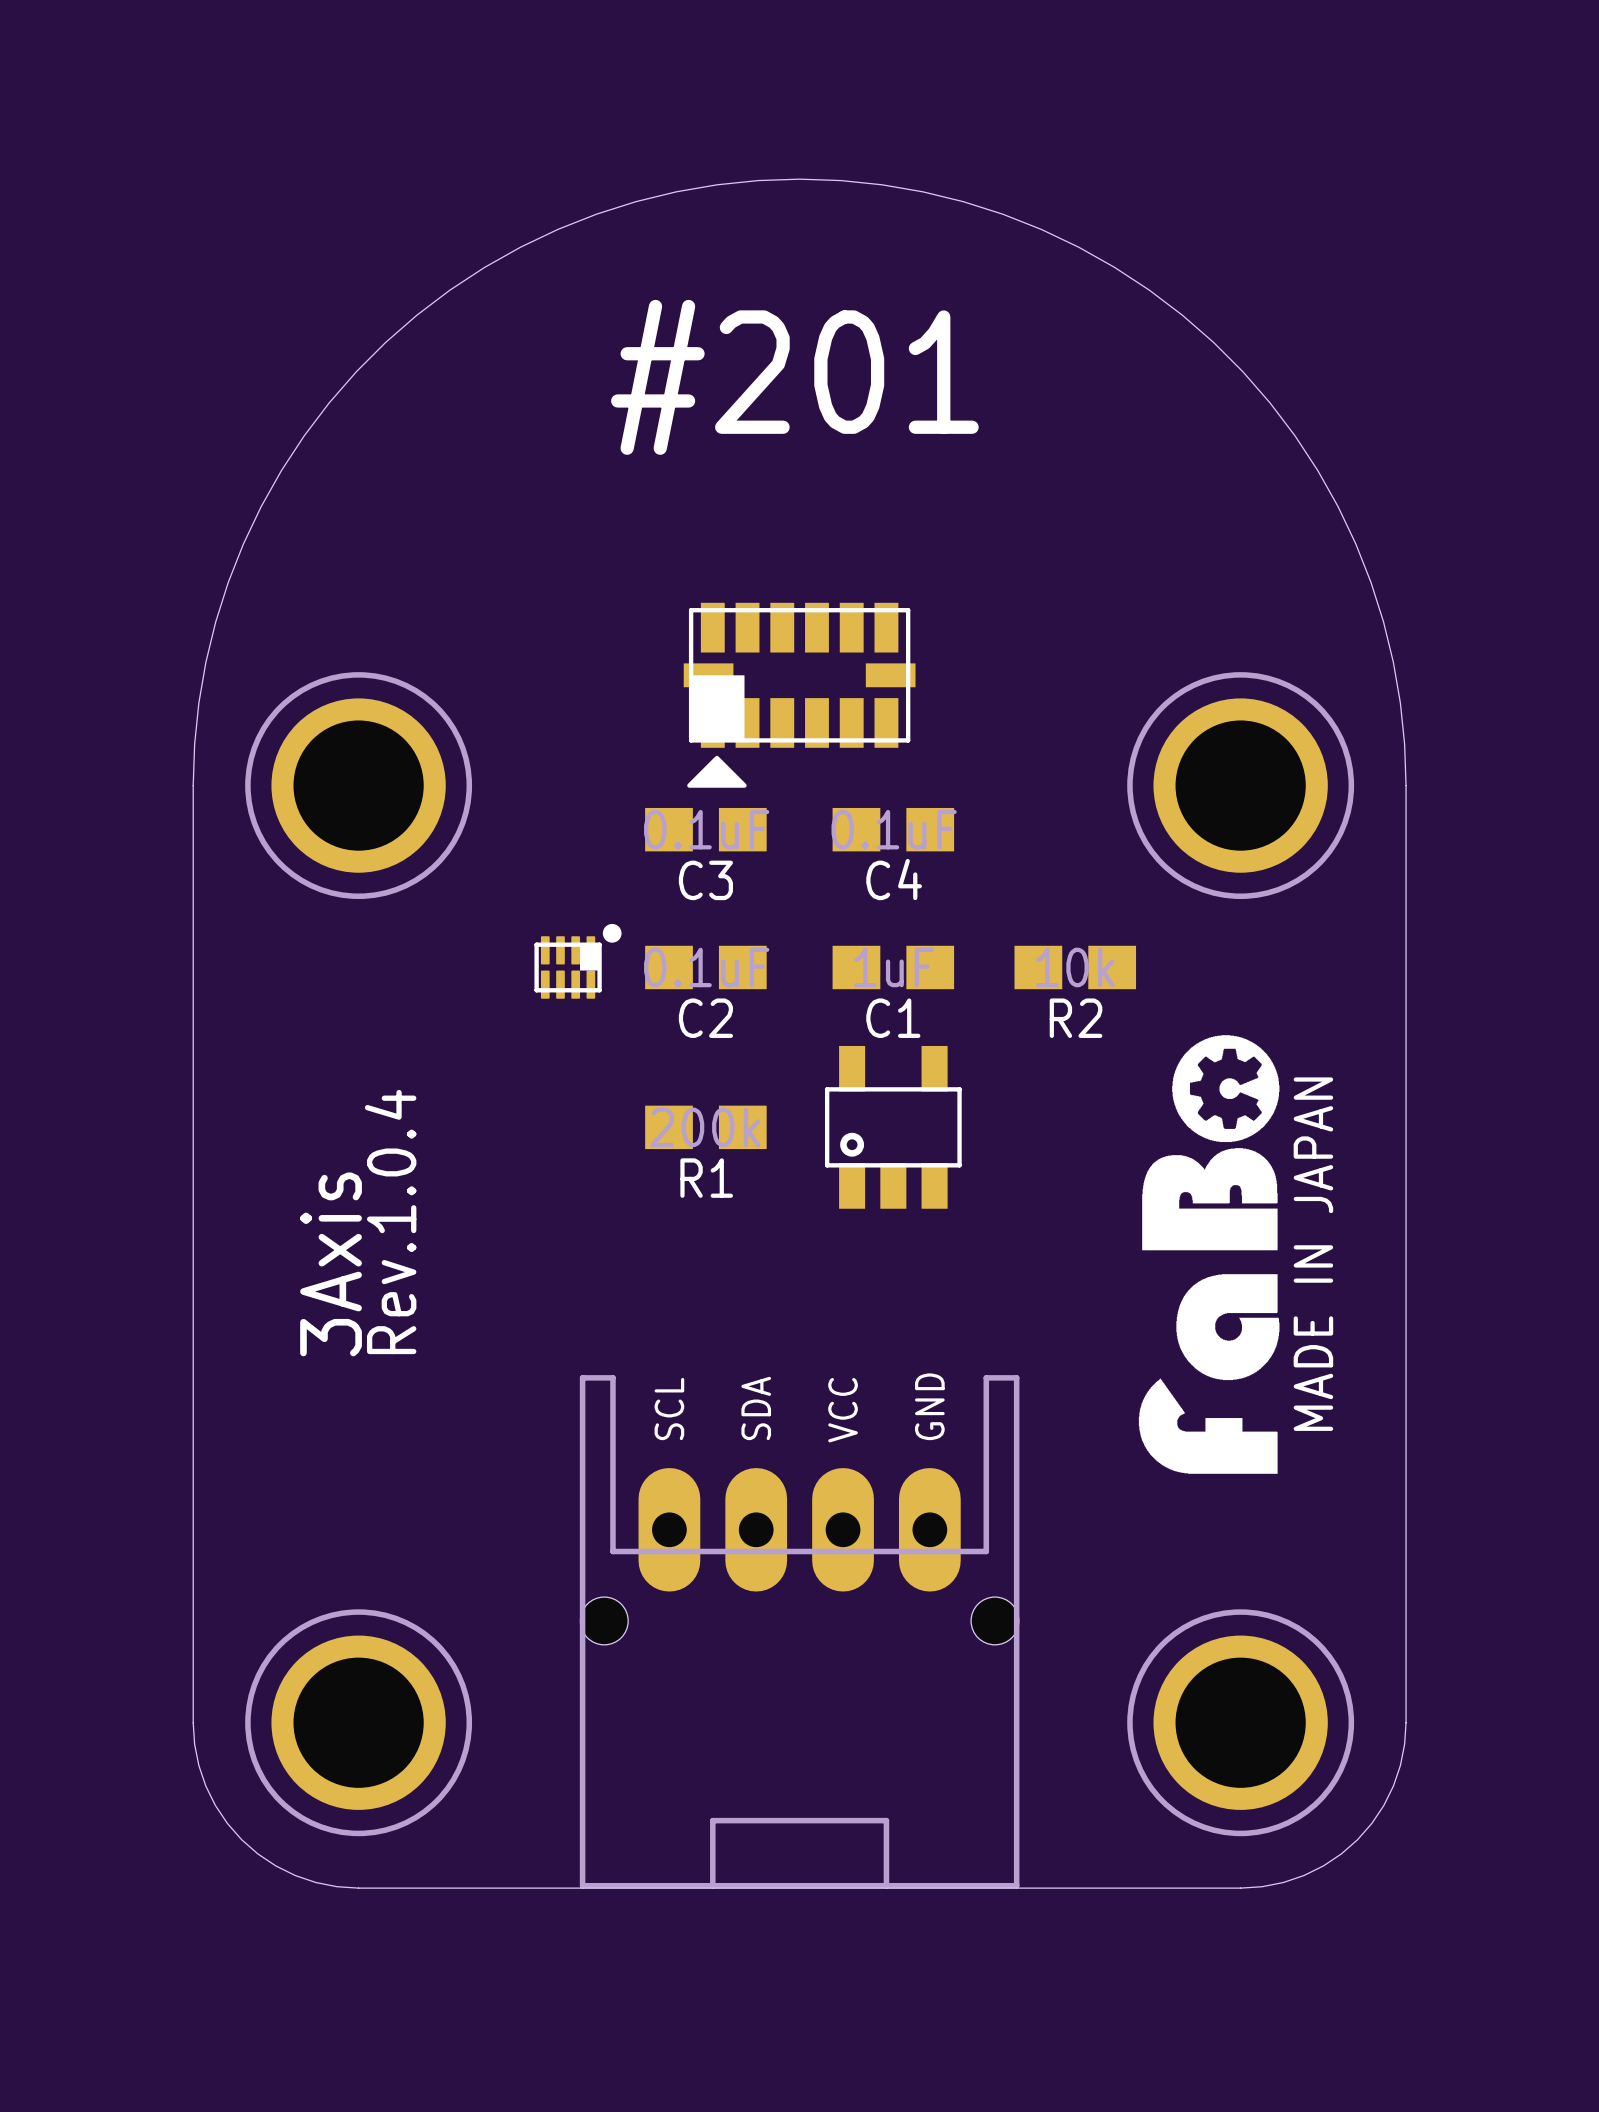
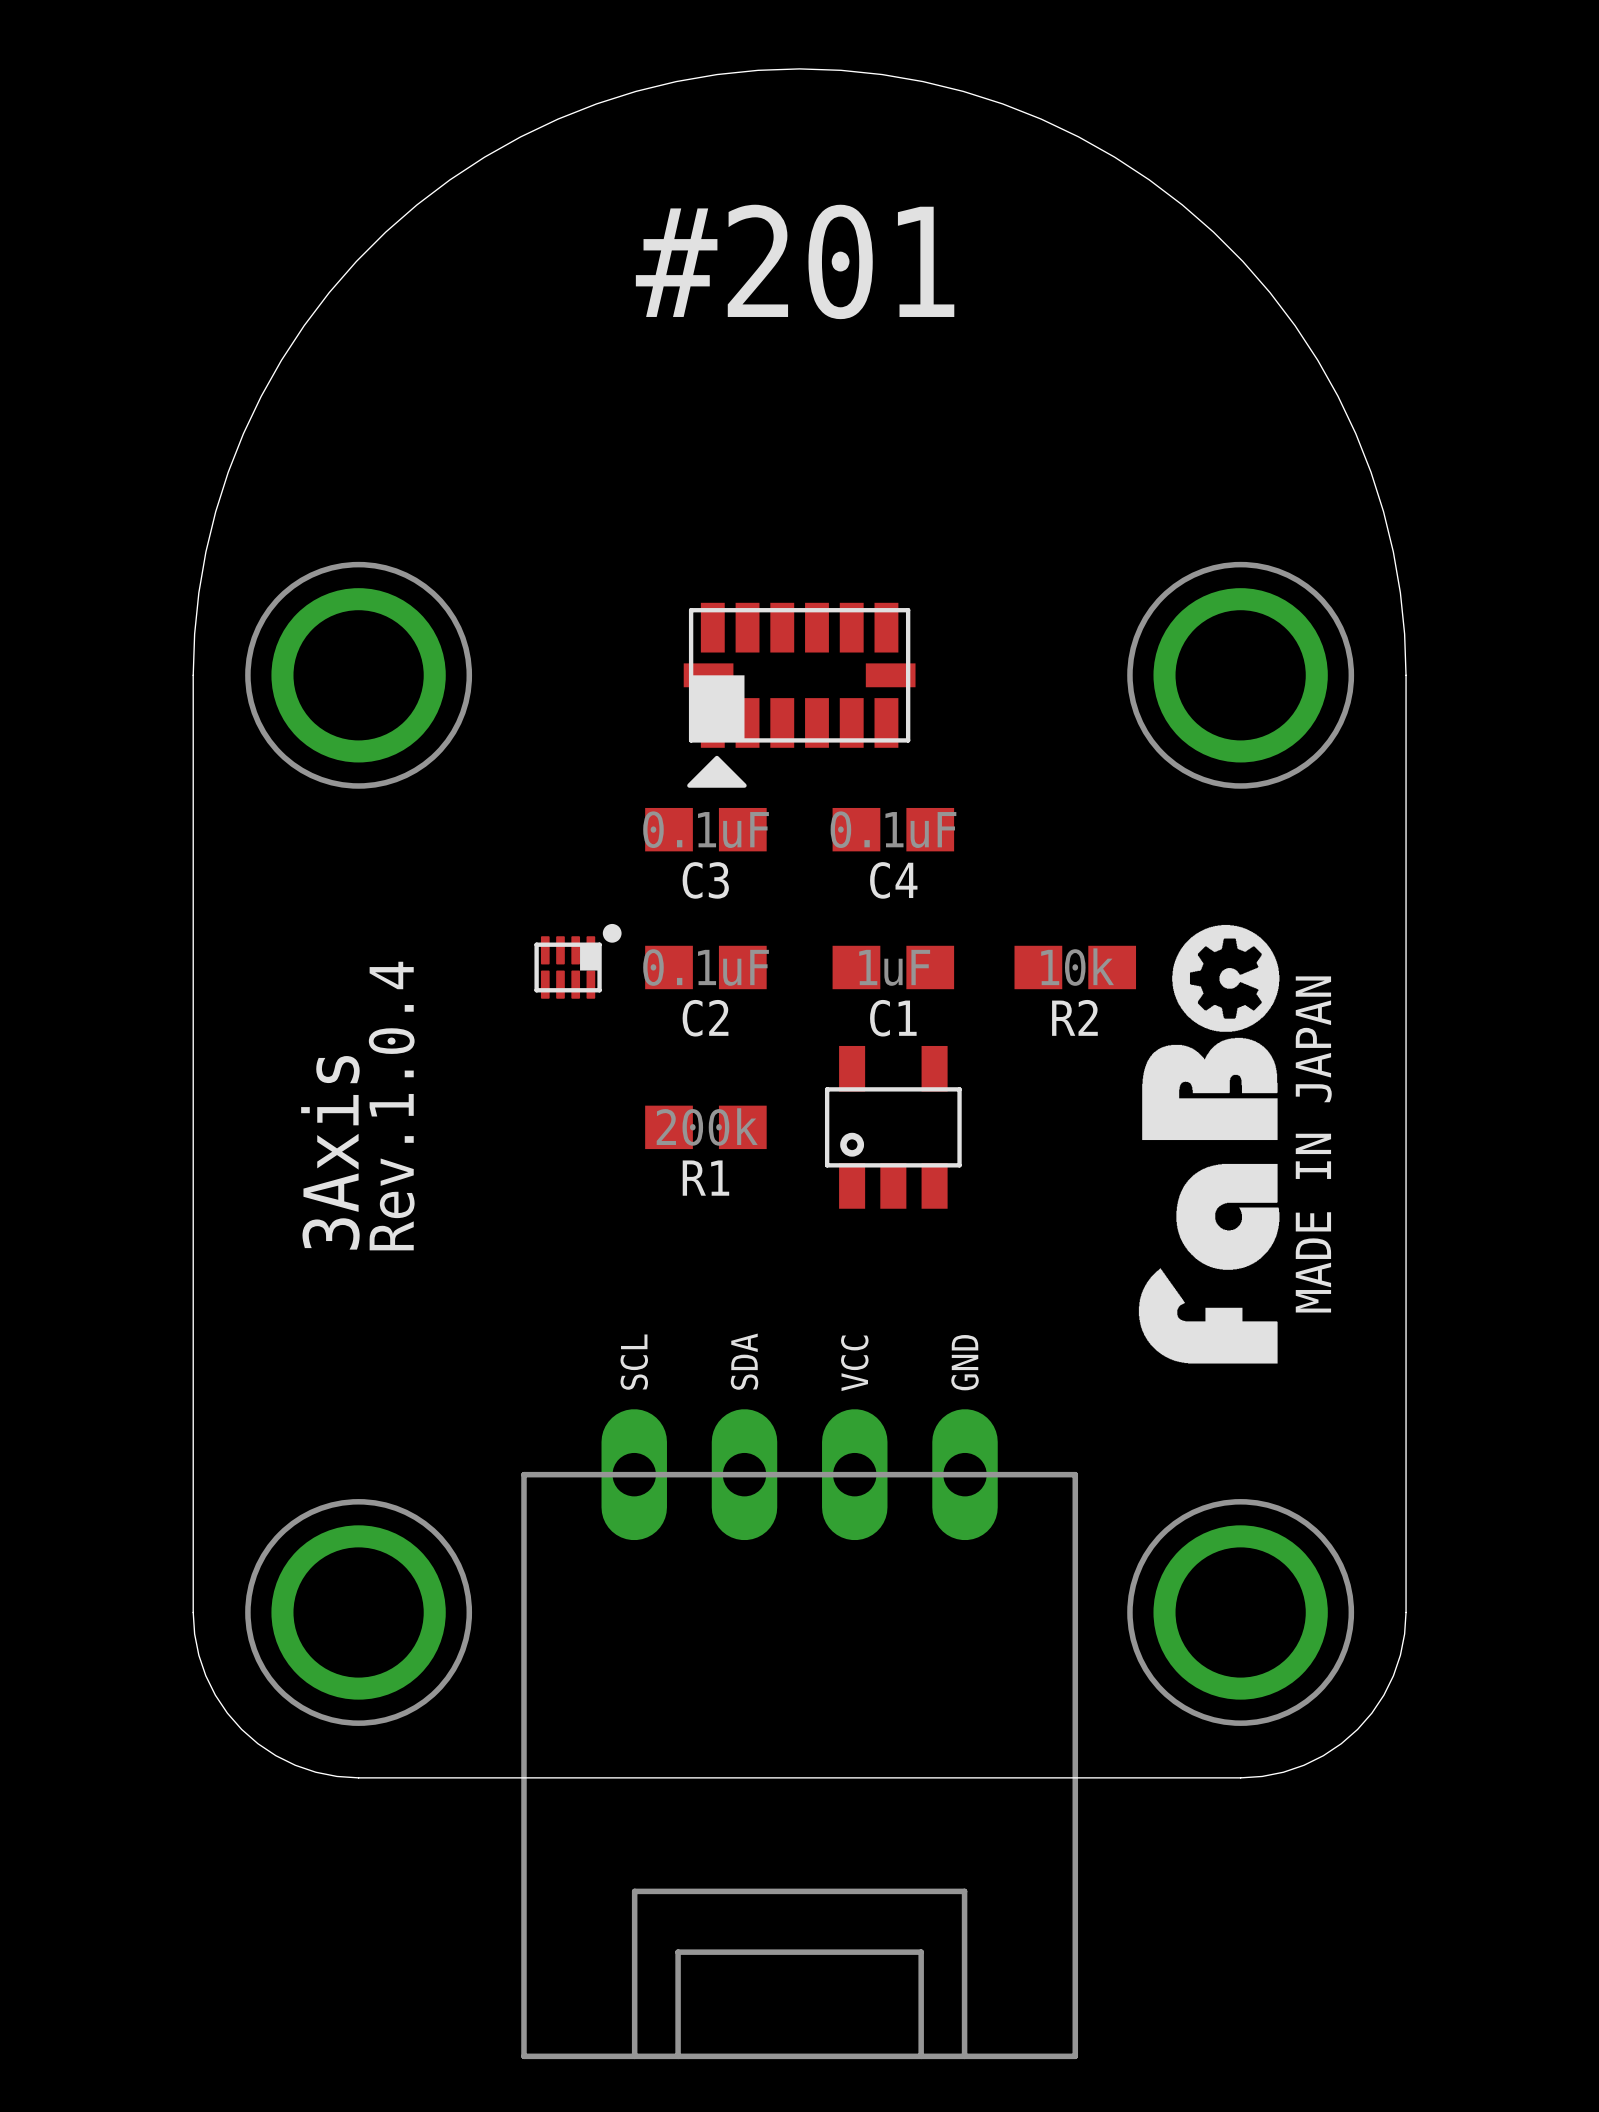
part footprint: [193, 179, 1407, 1889] -> [193, 68, 1407, 2060]
text position: #201 (794, 377) -> #201 (795, 261)
text position: Rev.1.0.4 (390, 1222) -> Rev.1.0.4 (391, 1106)
drawing position: (1209, 1254) -> (1209, 1144)
text position: MADE IN JAPAN (1313, 1254) -> MADE IN JAPAN (1313, 1144)
text position: 3Axis (331, 1264) -> 3Axis (330, 1152)

